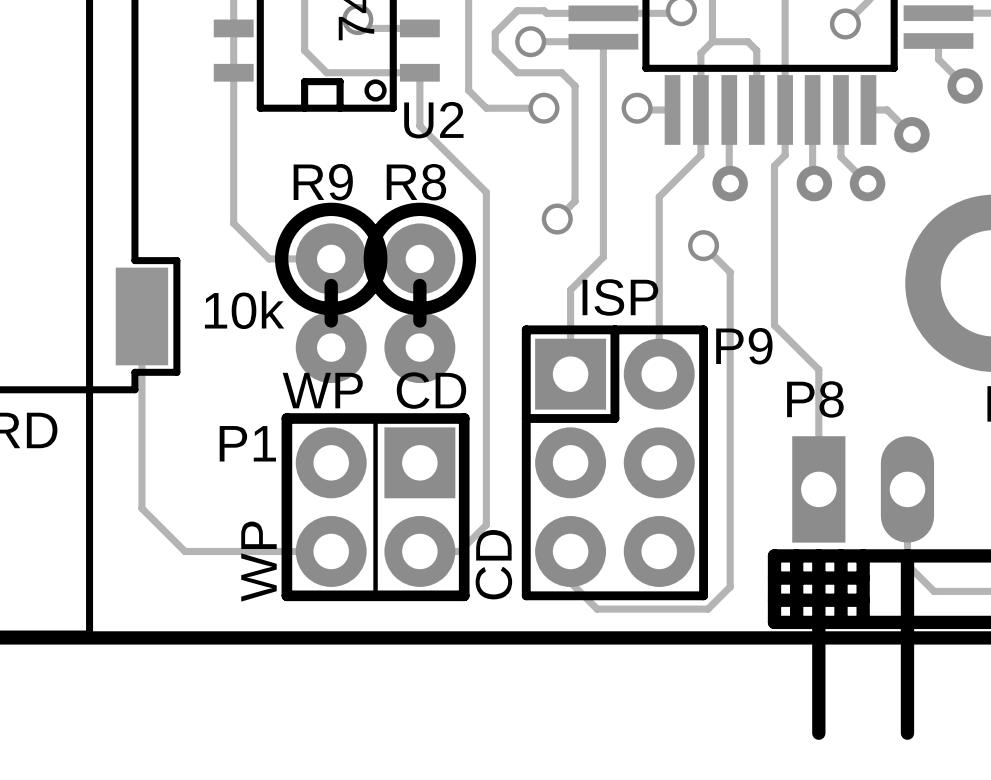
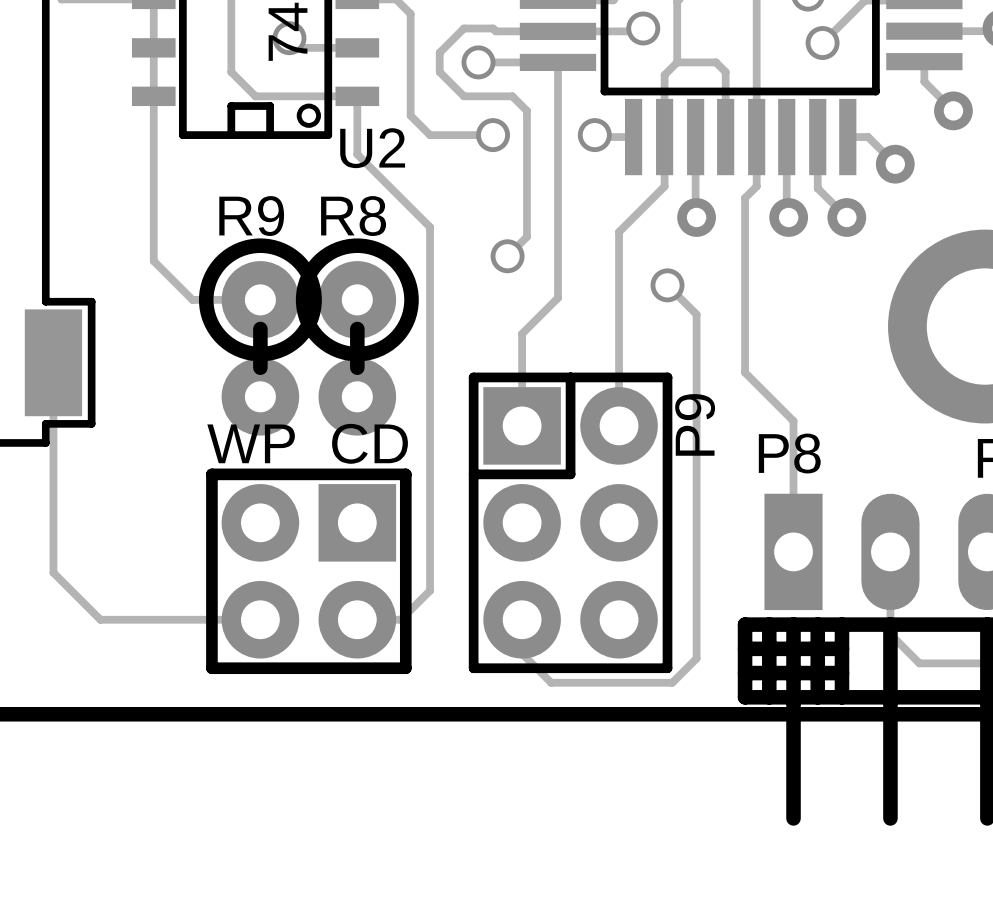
P9 value: ISP (620, 297) -> none
R9 value: 10k (244, 310) -> none
P9 name rotation: 0° (744, 346) -> 90° counterclockwise (695, 424)
line: (375, 418) (375, 595) -> none
P1 name: P1 (247, 443) -> none
text: WP (258, 561) -> none
text: CD (493, 564) -> none

